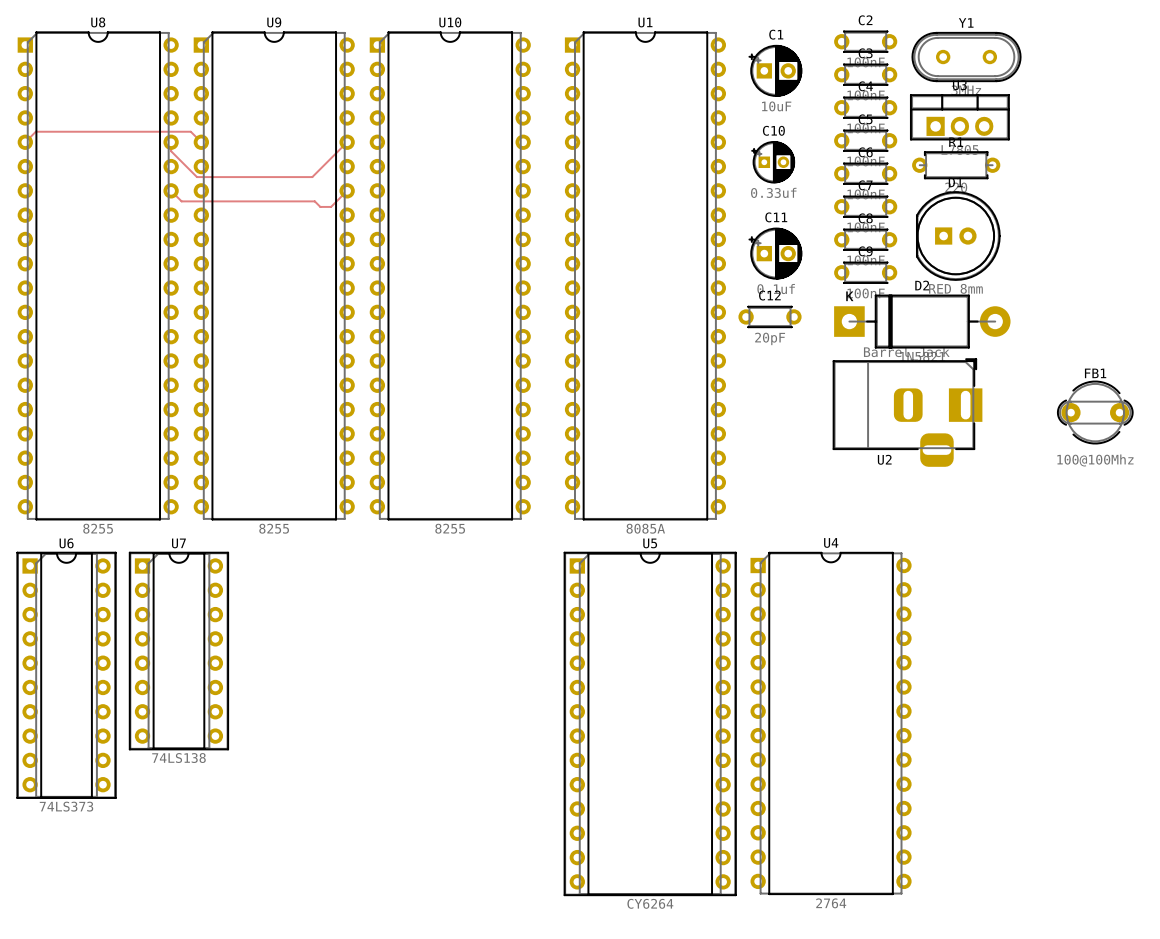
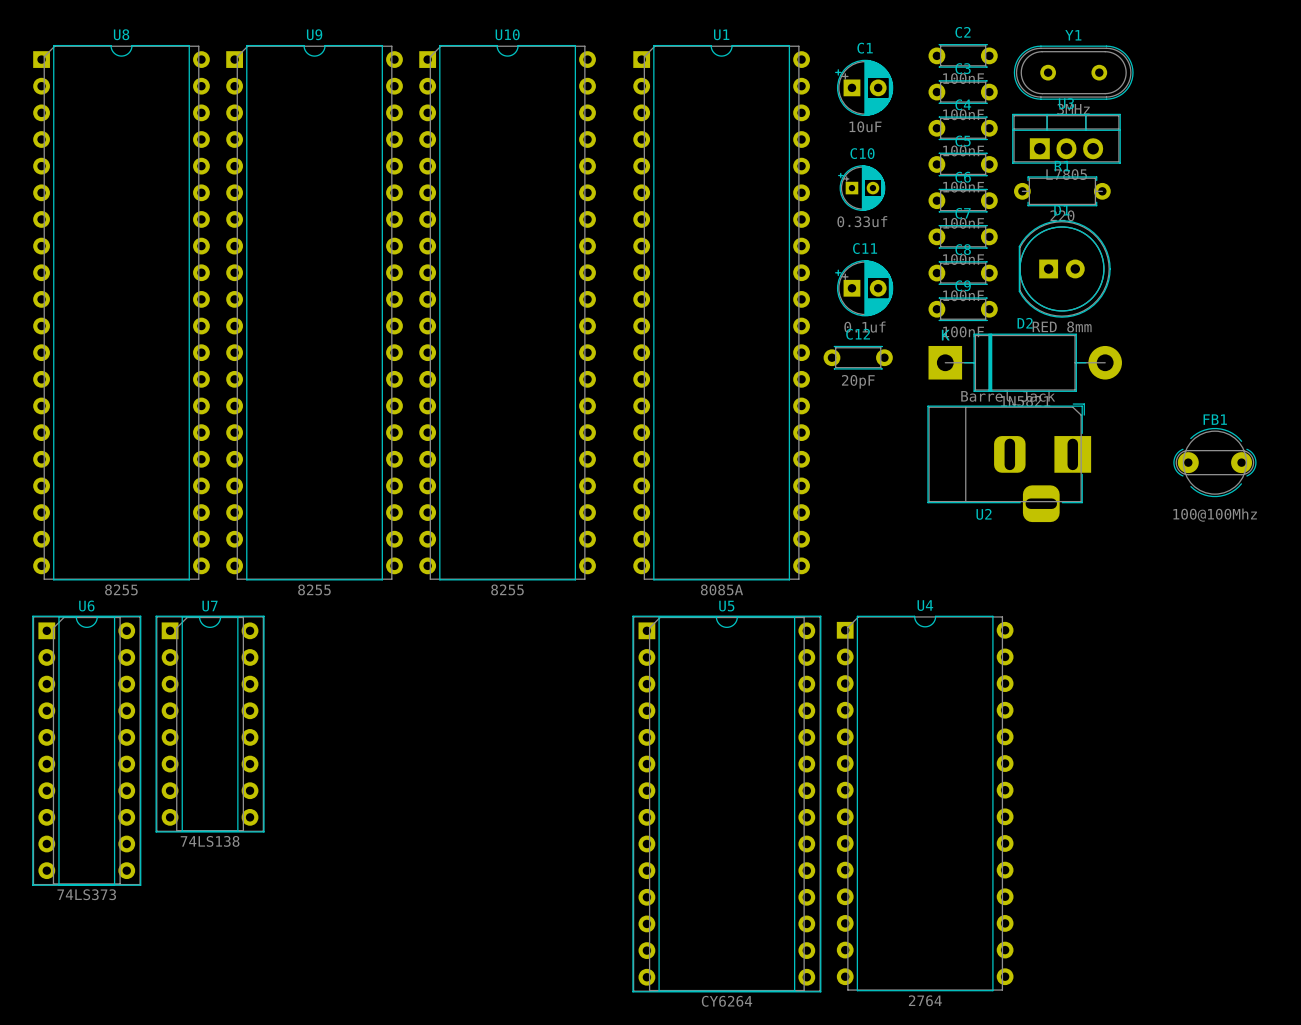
top track: (25, 142) (35, 131) (190, 131) (201, 142) -> none
top track: (171, 142) (171, 151) (196, 177) (312, 177) (347, 142) -> none
top track: (171, 190) (181, 201) (314, 201) (320, 206) (331, 206) (347, 190) -> none

